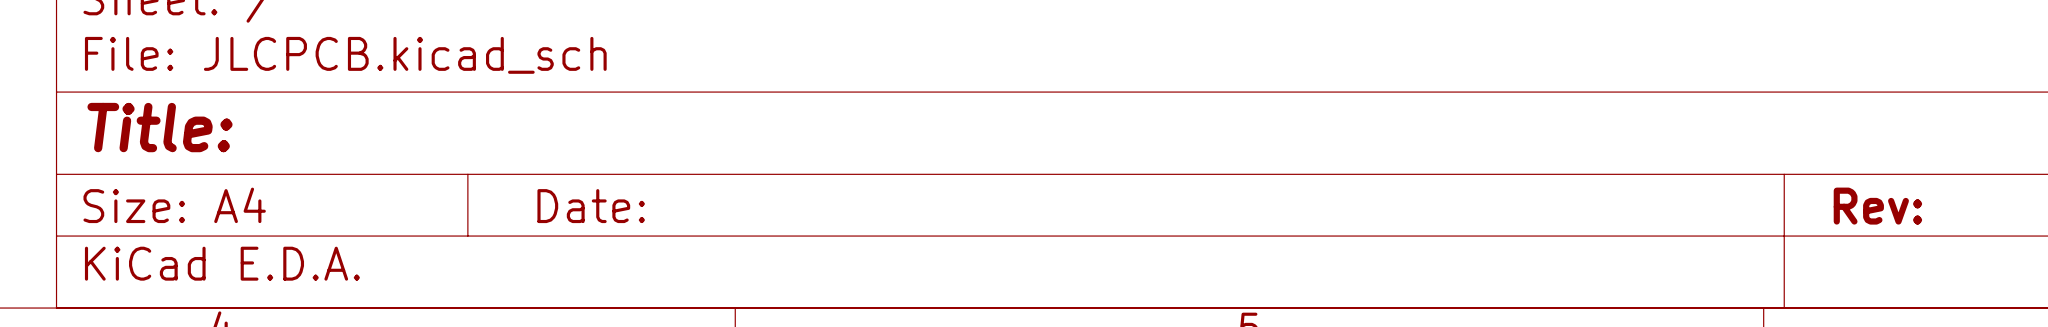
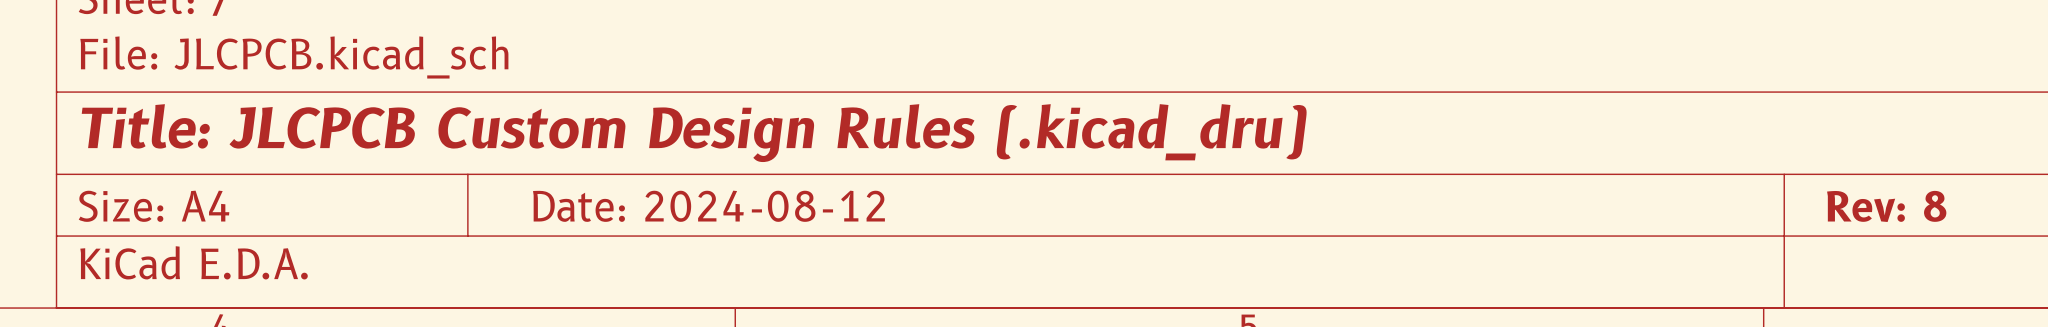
title block: Title: (160, 127) -> Title: JLCPCB Custom Design Rules (.kicad_dru) (694, 133)
title block: Date: (591, 206) -> Date: 2024-08-12 (708, 206)
title block: Rev: (1877, 206) -> Rev: 8 (1886, 206)

